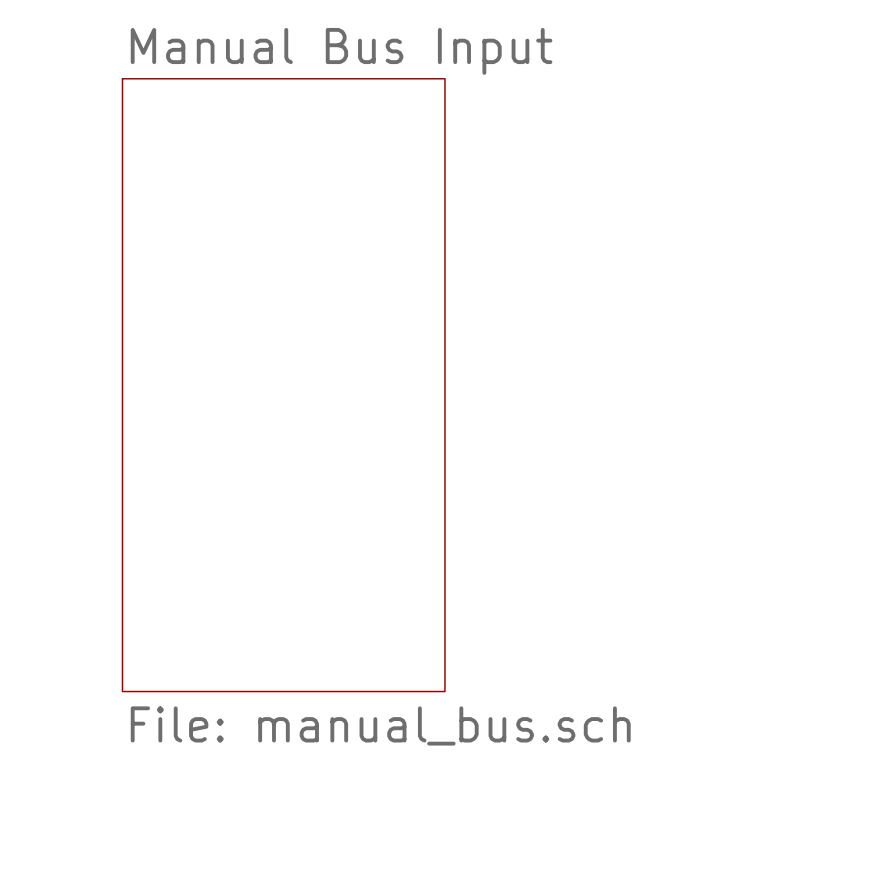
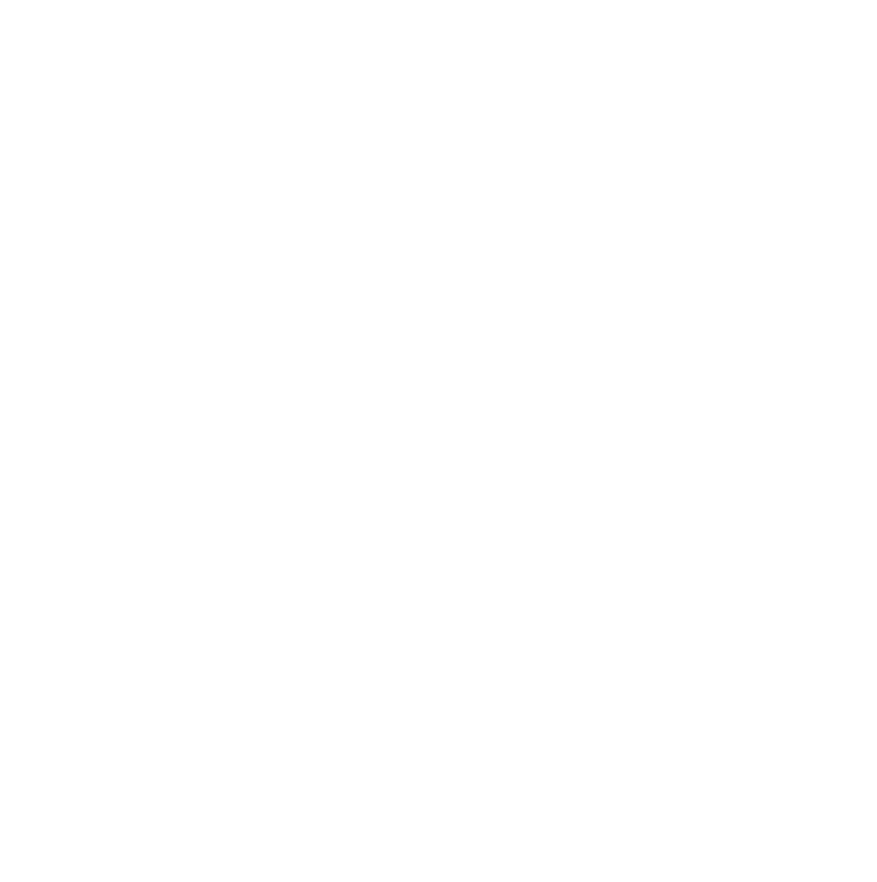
sheet Manual Bus Input: File: manual_bus.sch (283, 385) -> none

